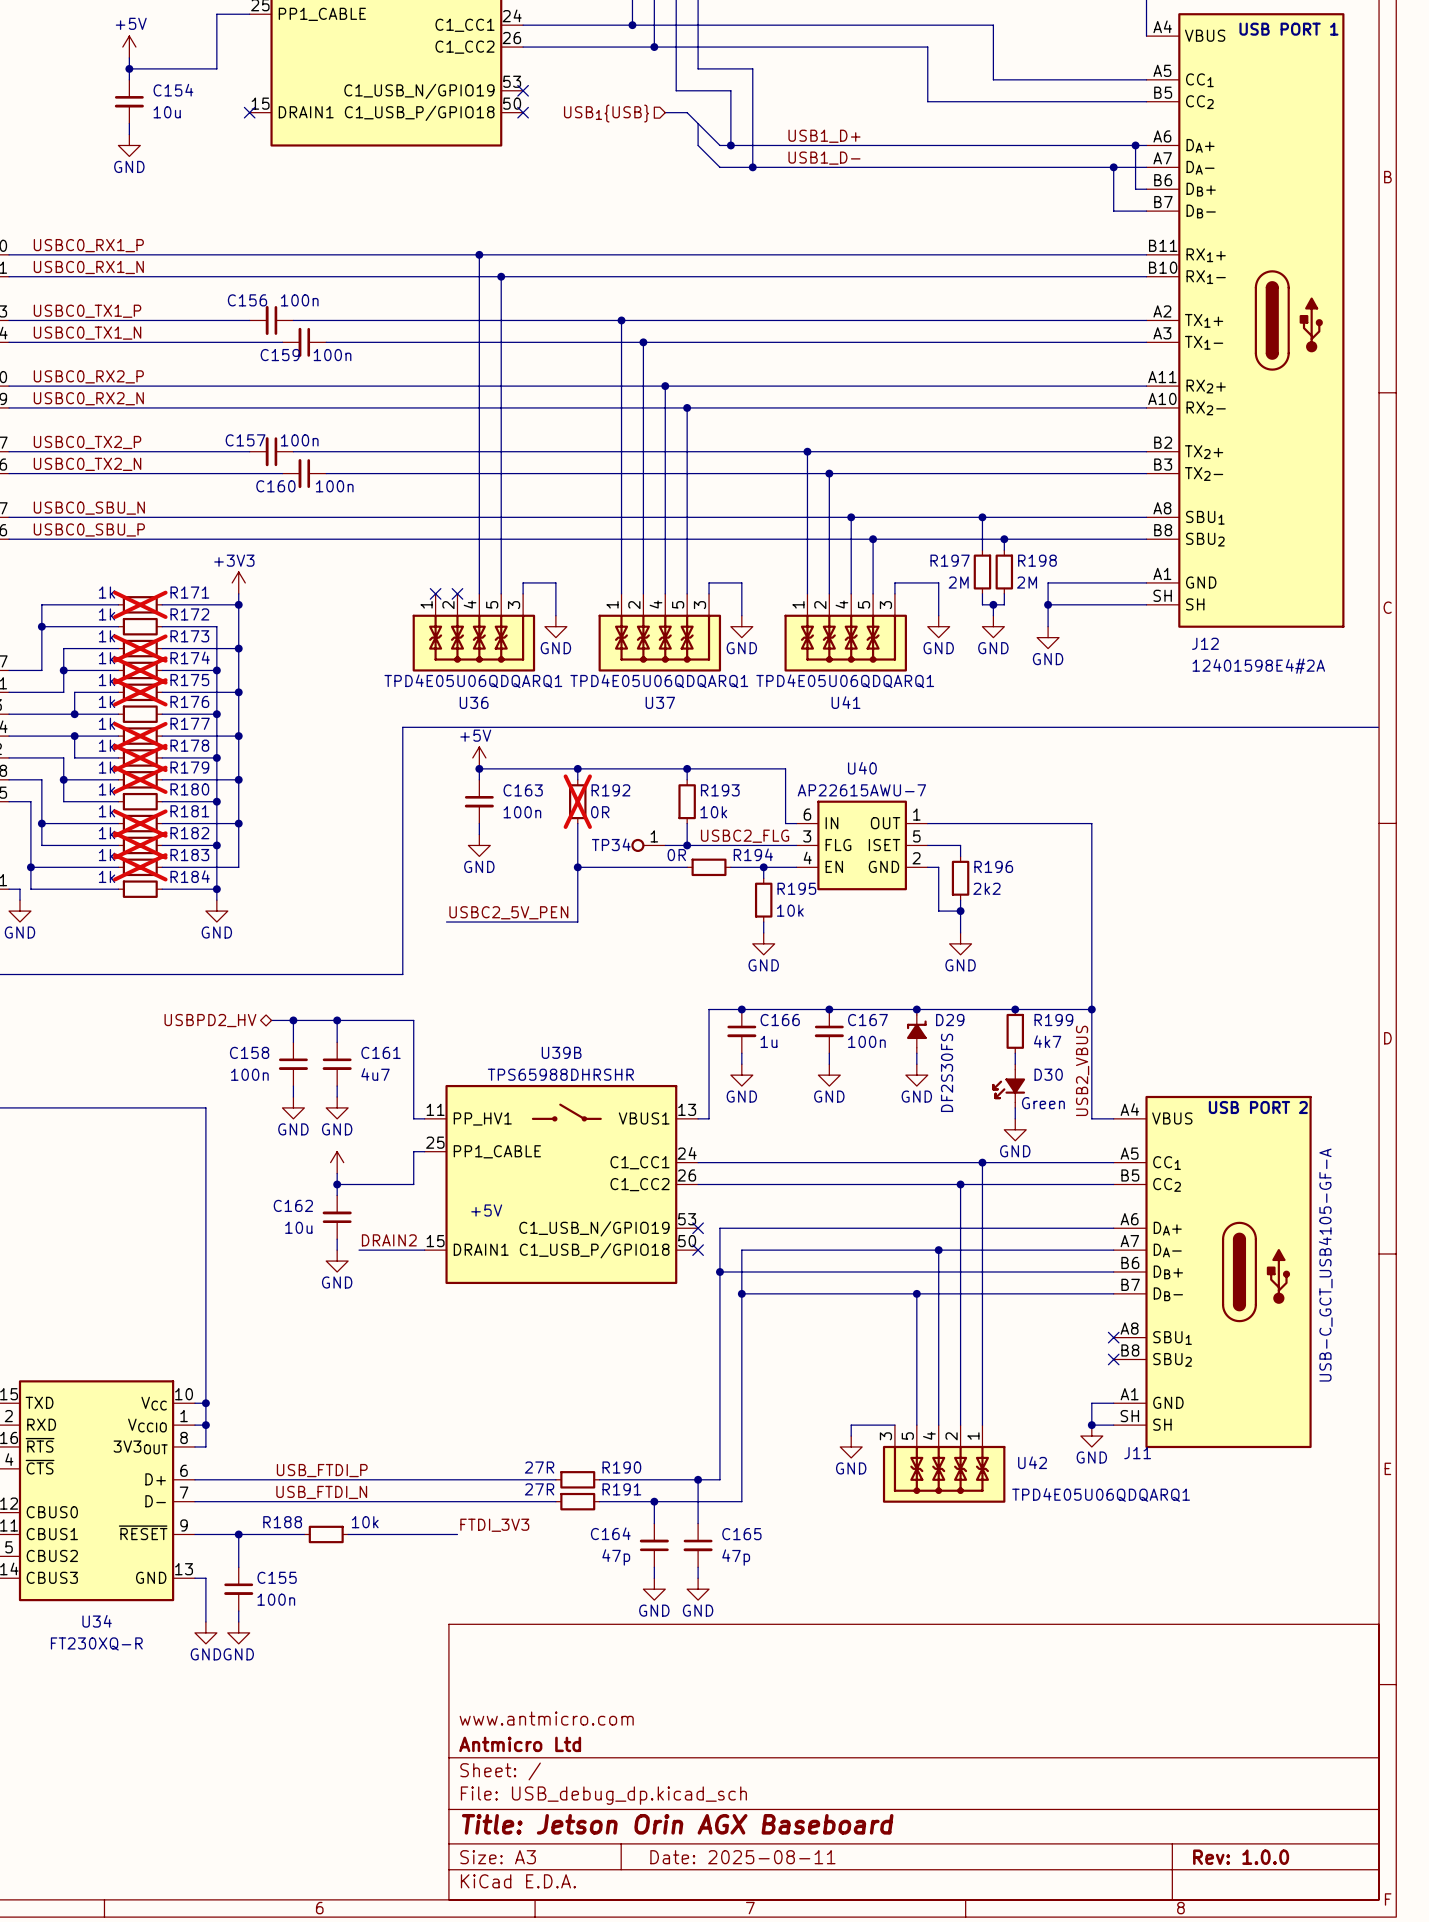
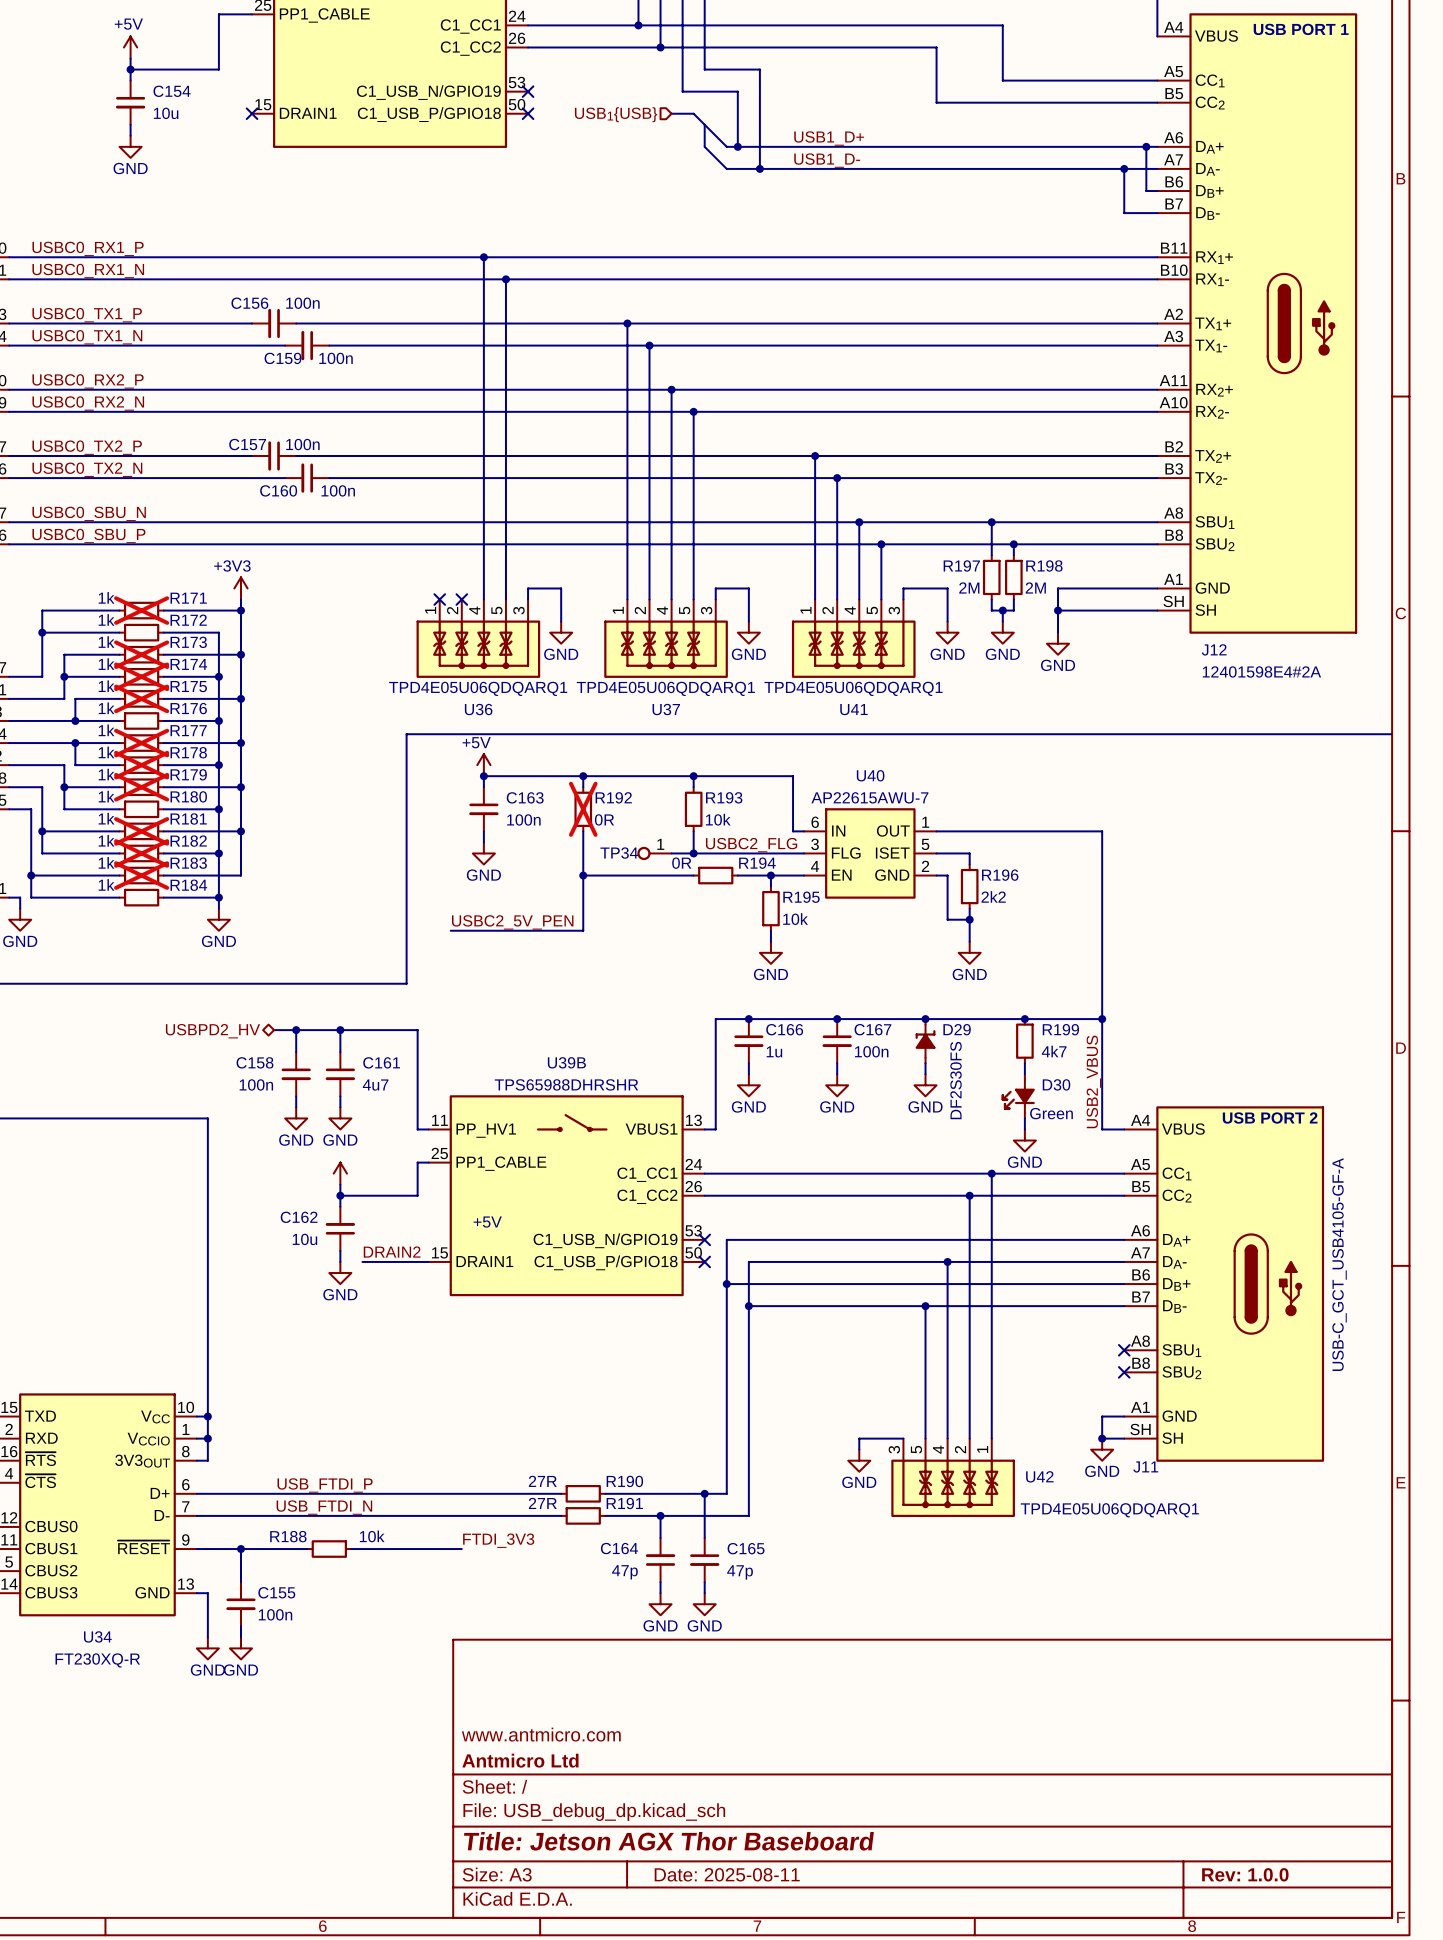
title block: Title: Jetson Orin AGX Baseboard (677, 1824) -> Title: Jetson AGX Thor Baseboard (668, 1841)

